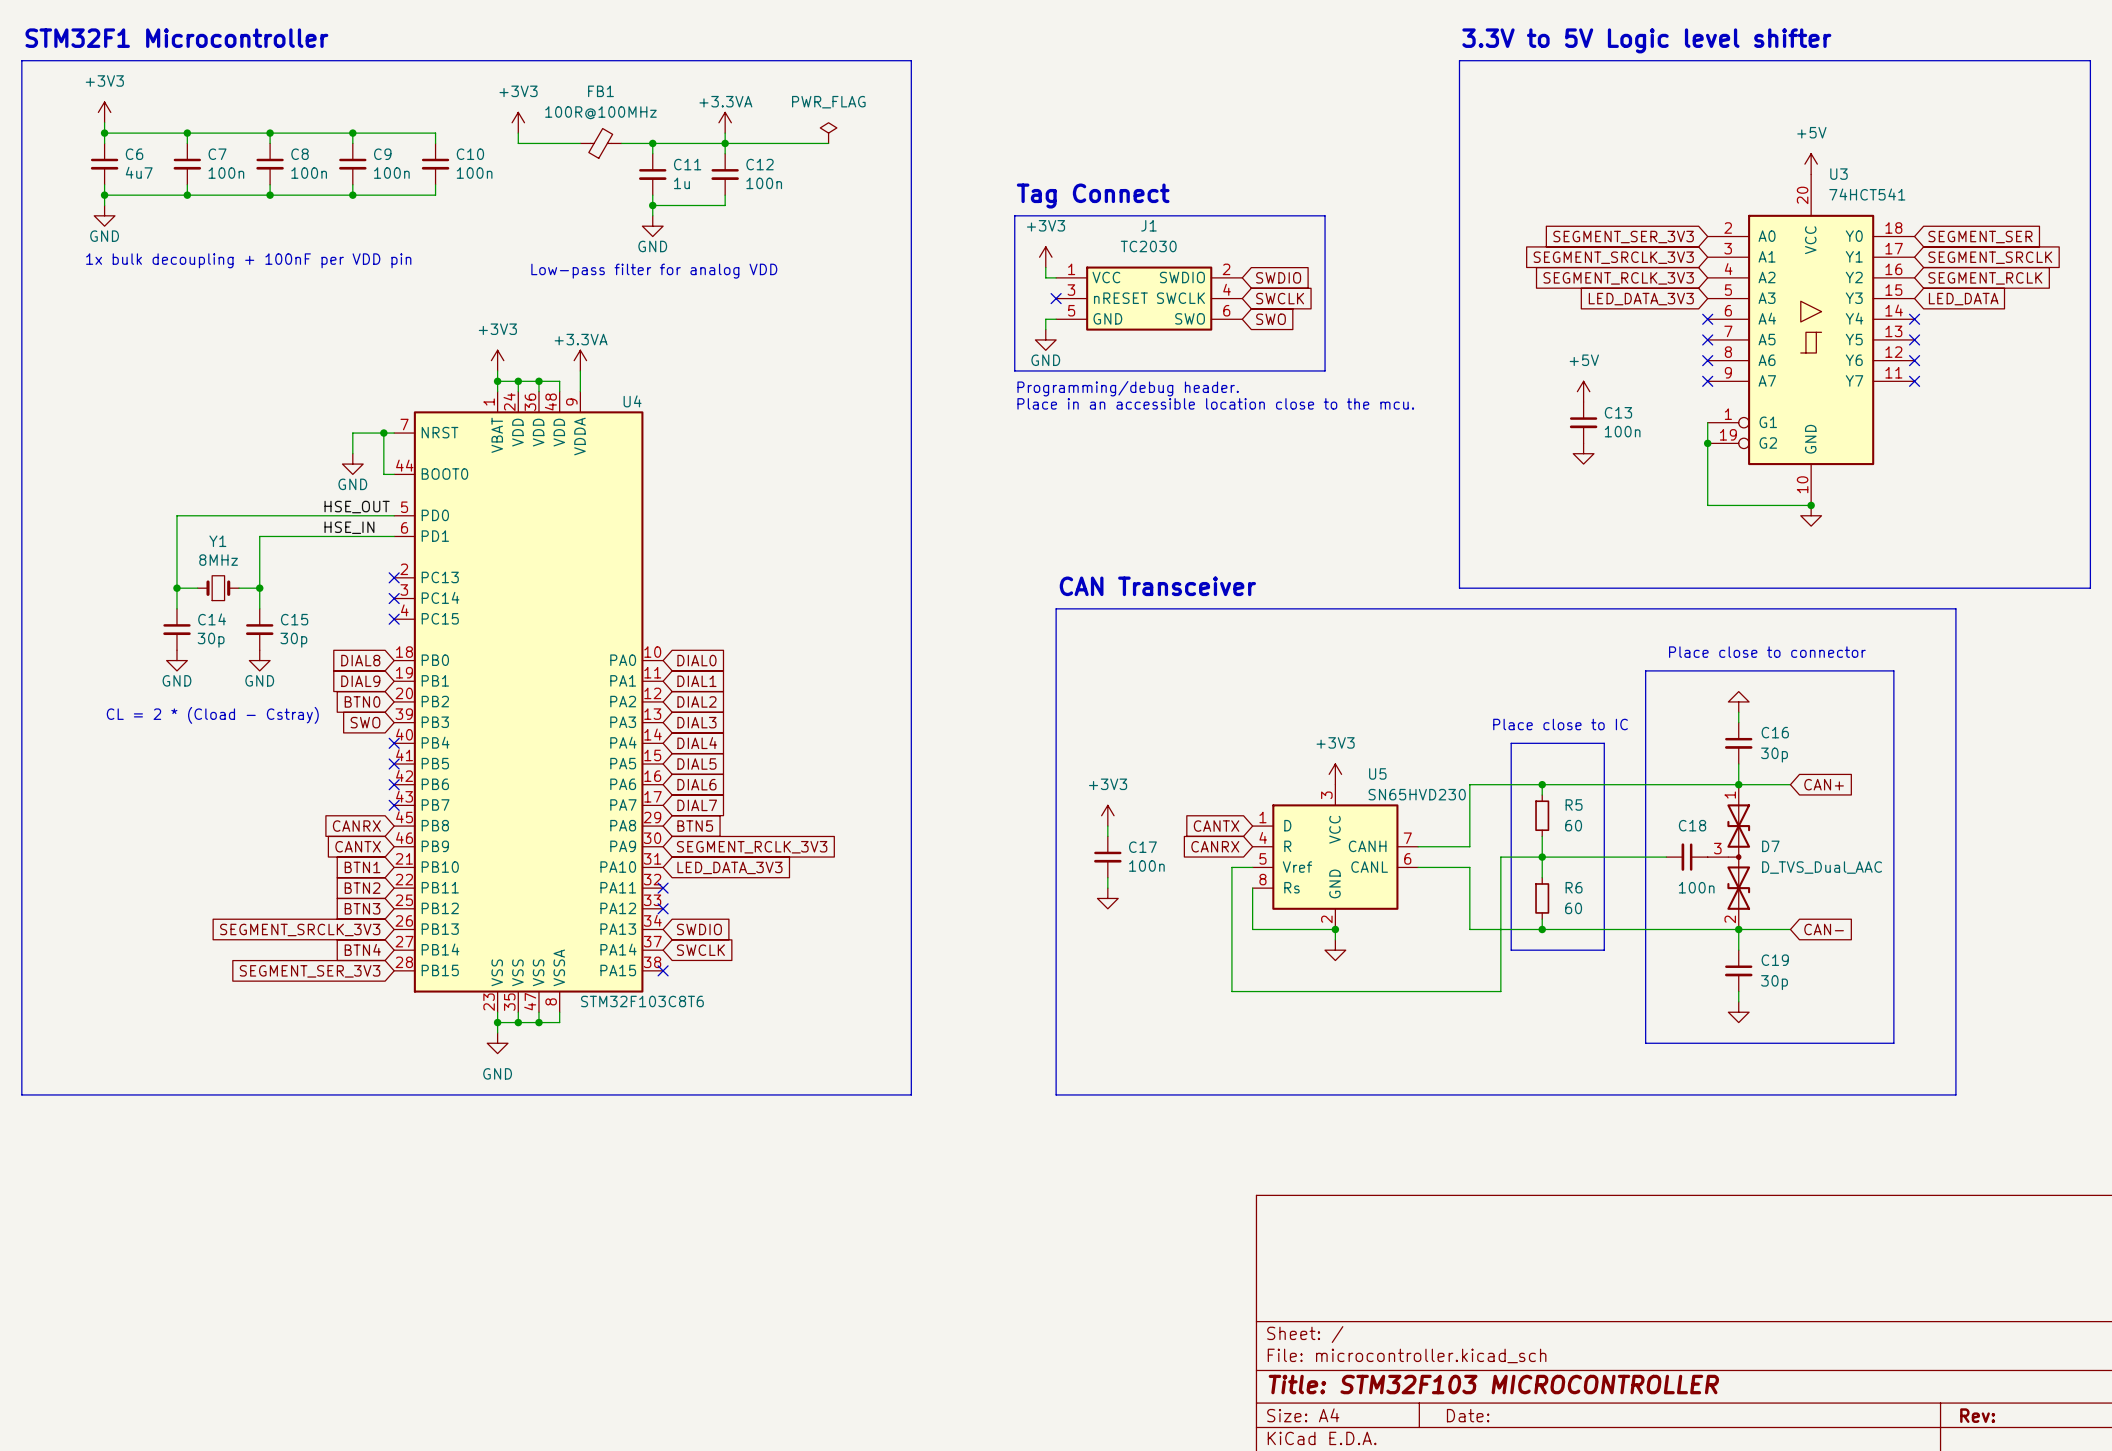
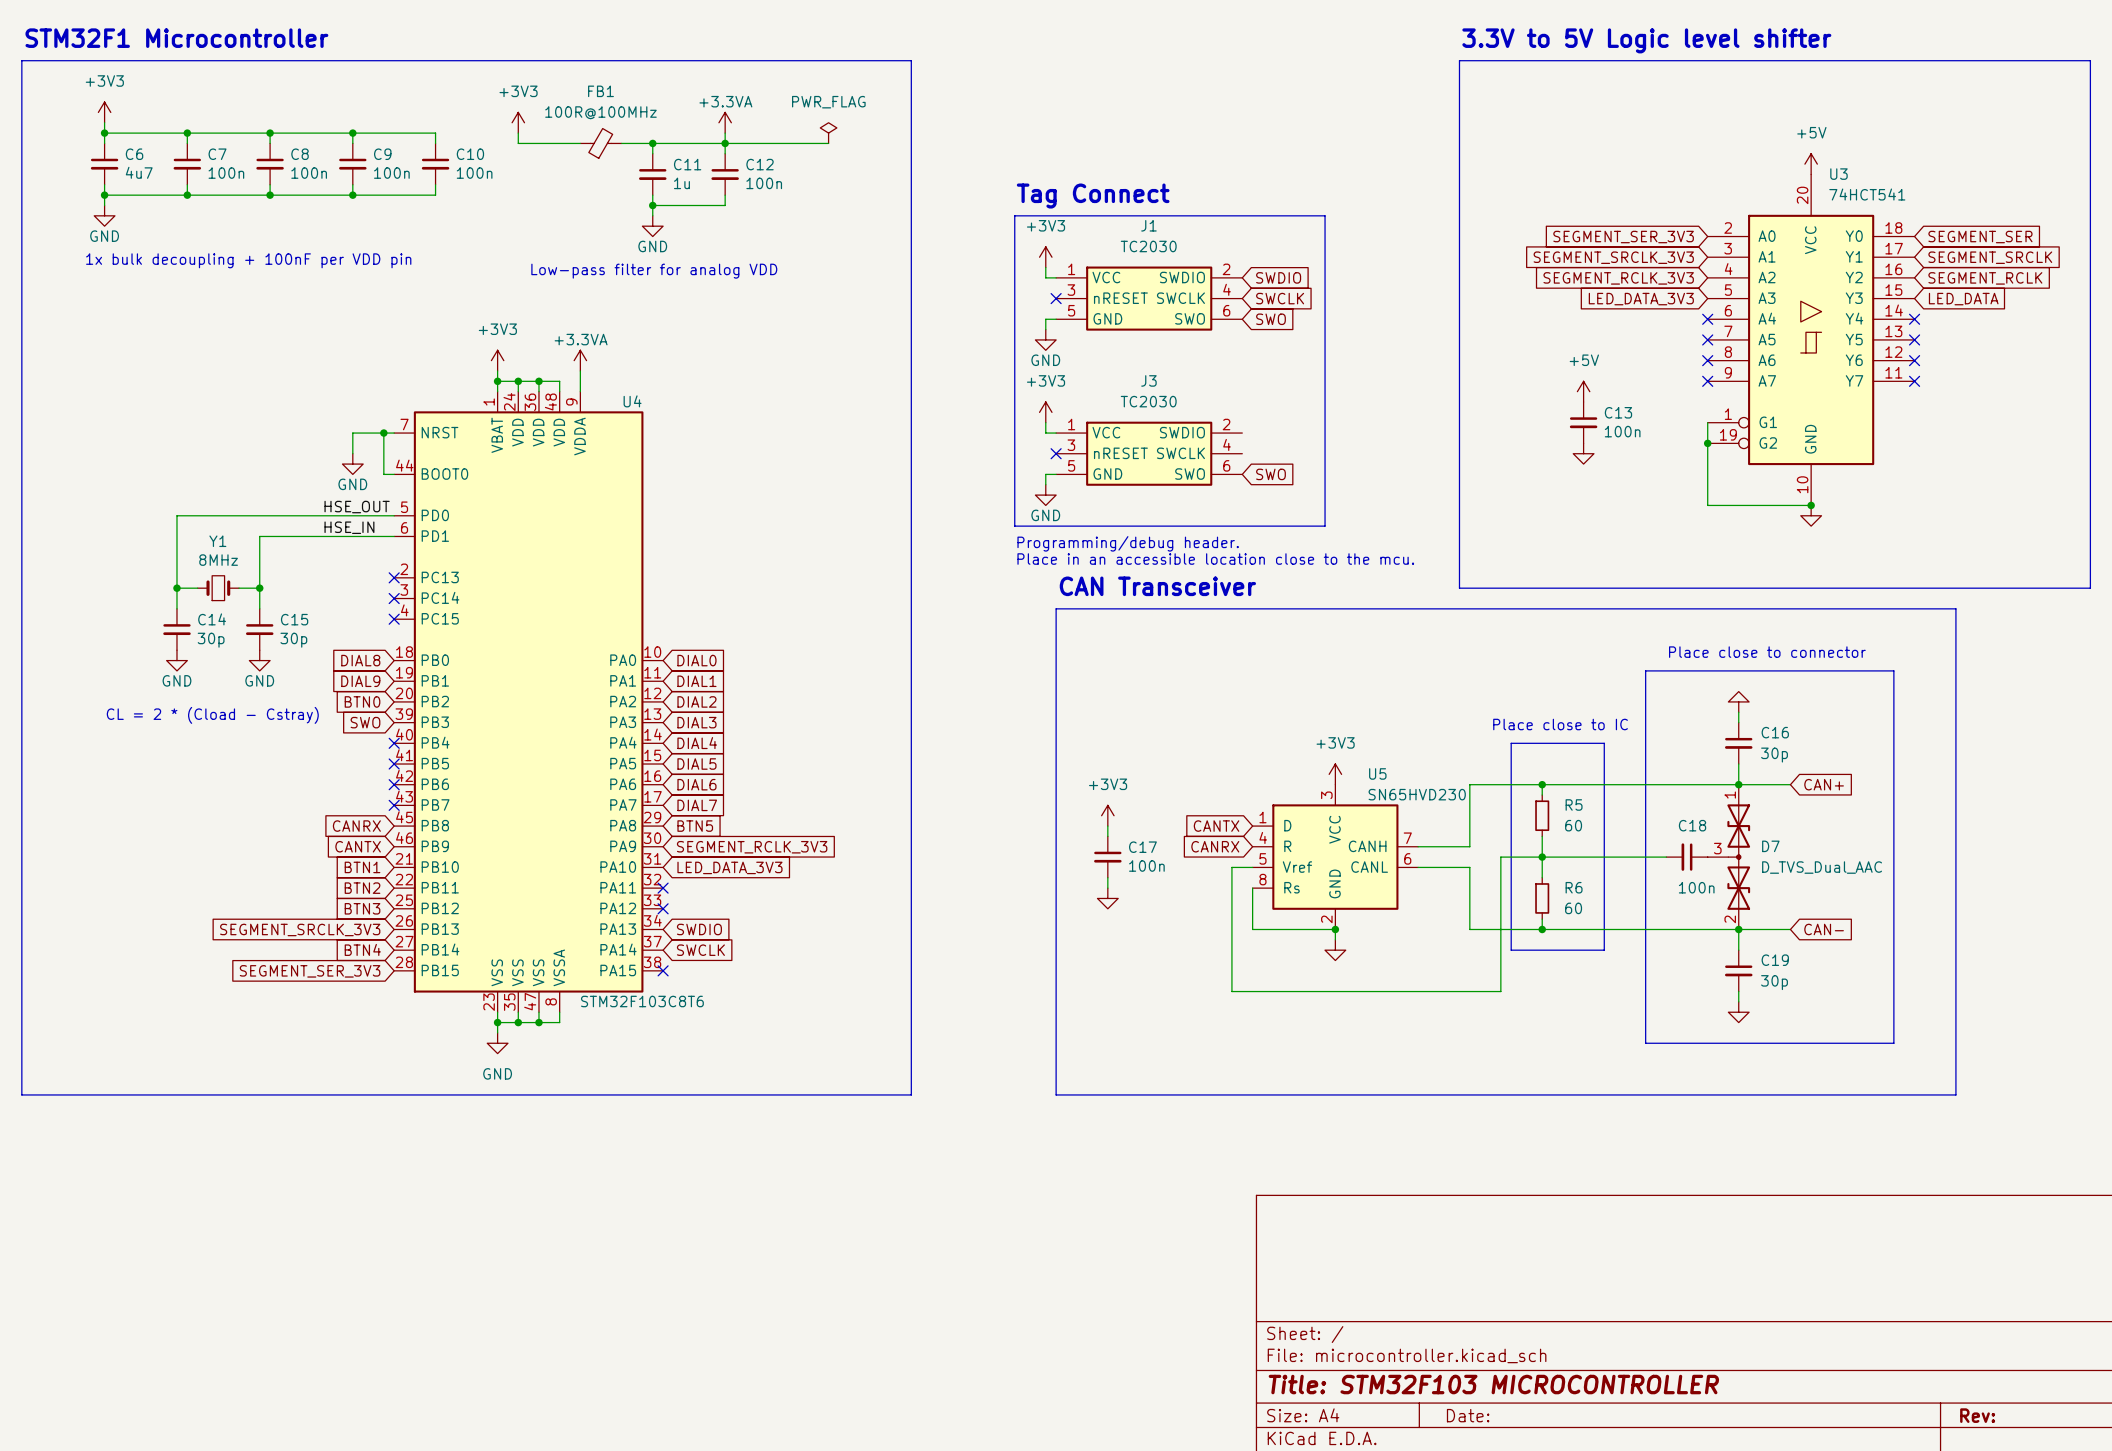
line: (1014, 370) (1325, 370) -> (1014, 370) (1014, 526) (1325, 526) (1325, 370)
text position: Programming/debug header. (1128, 388) -> Programming/debug header. (1128, 543)
text position: Place in an accessible location close to the mcu. (1215, 403) -> Place in an accessible location close to the mcu. (1215, 559)
power symbol: none -> +3V3 (1045, 412)
wire: none -> (1045, 422) (1045, 433) (1056, 433)
no-connect mark: none -> (1056, 453)
J3: none -> TC2030 (1149, 453)
wire: none -> (1056, 474) (1045, 474) (1045, 484)
global label: none -> SWO (1270, 474)
power symbol: none -> GND (1045, 495)

